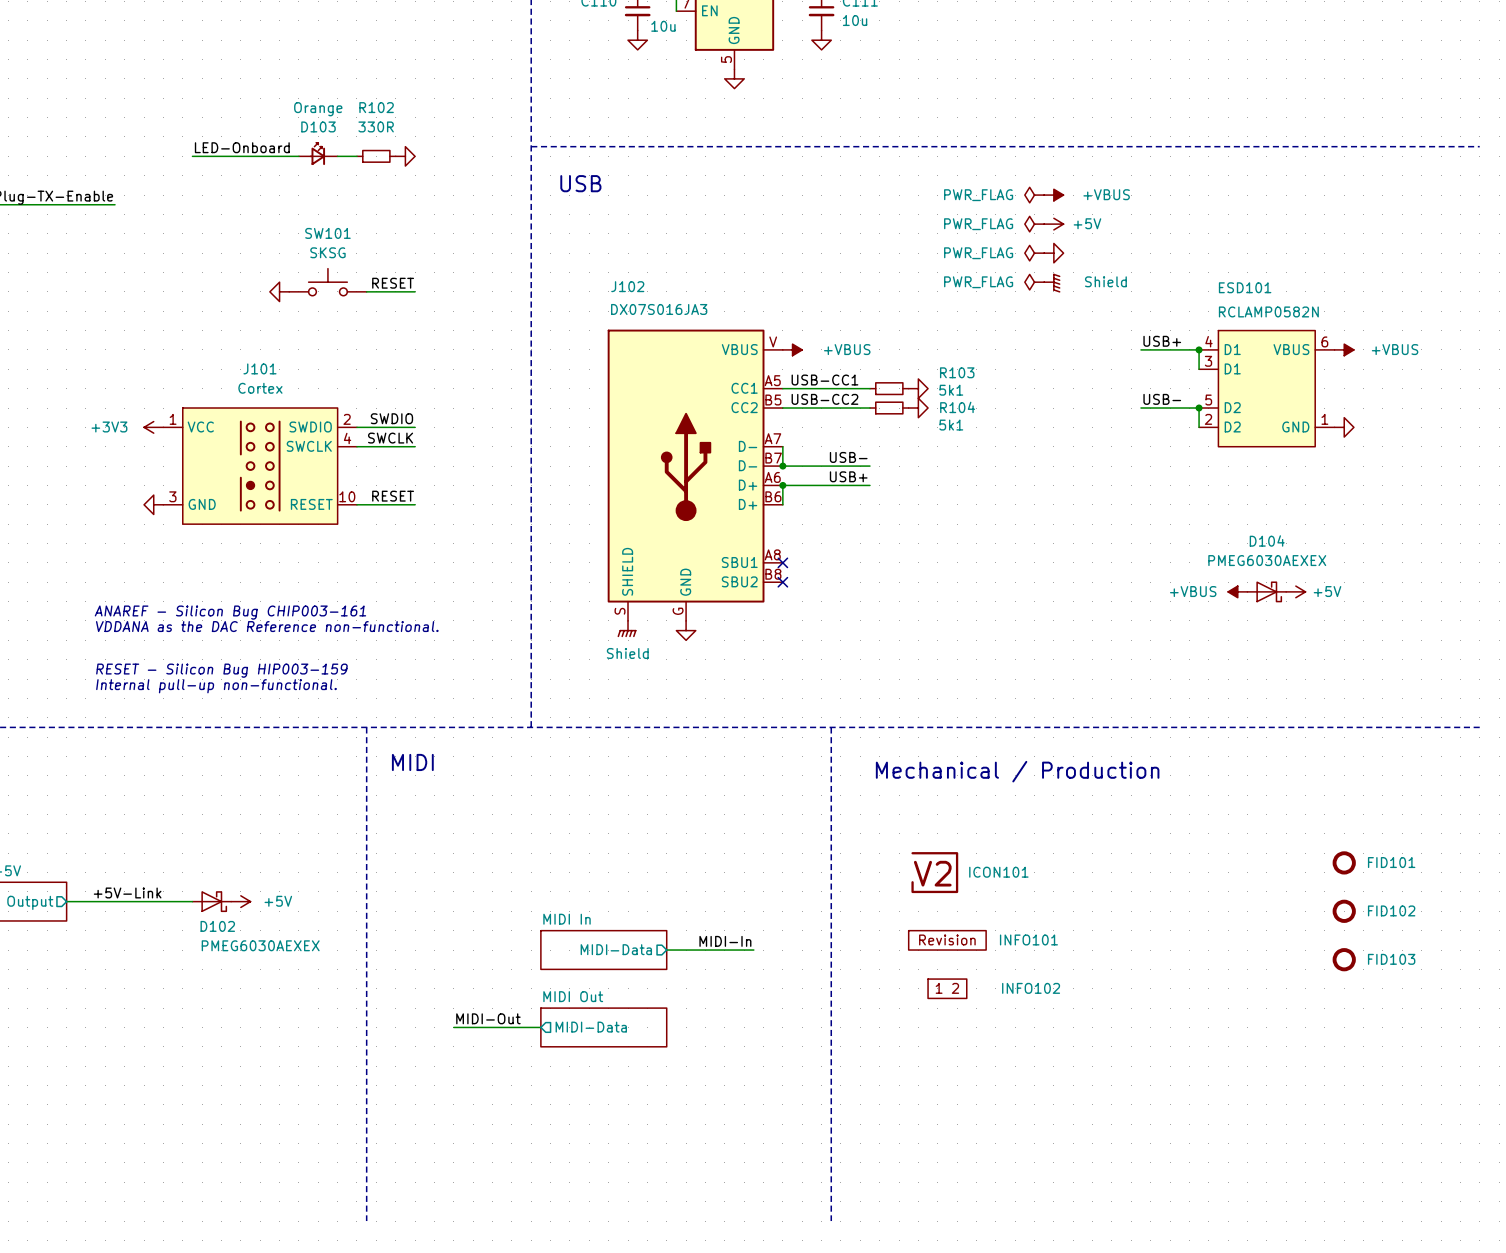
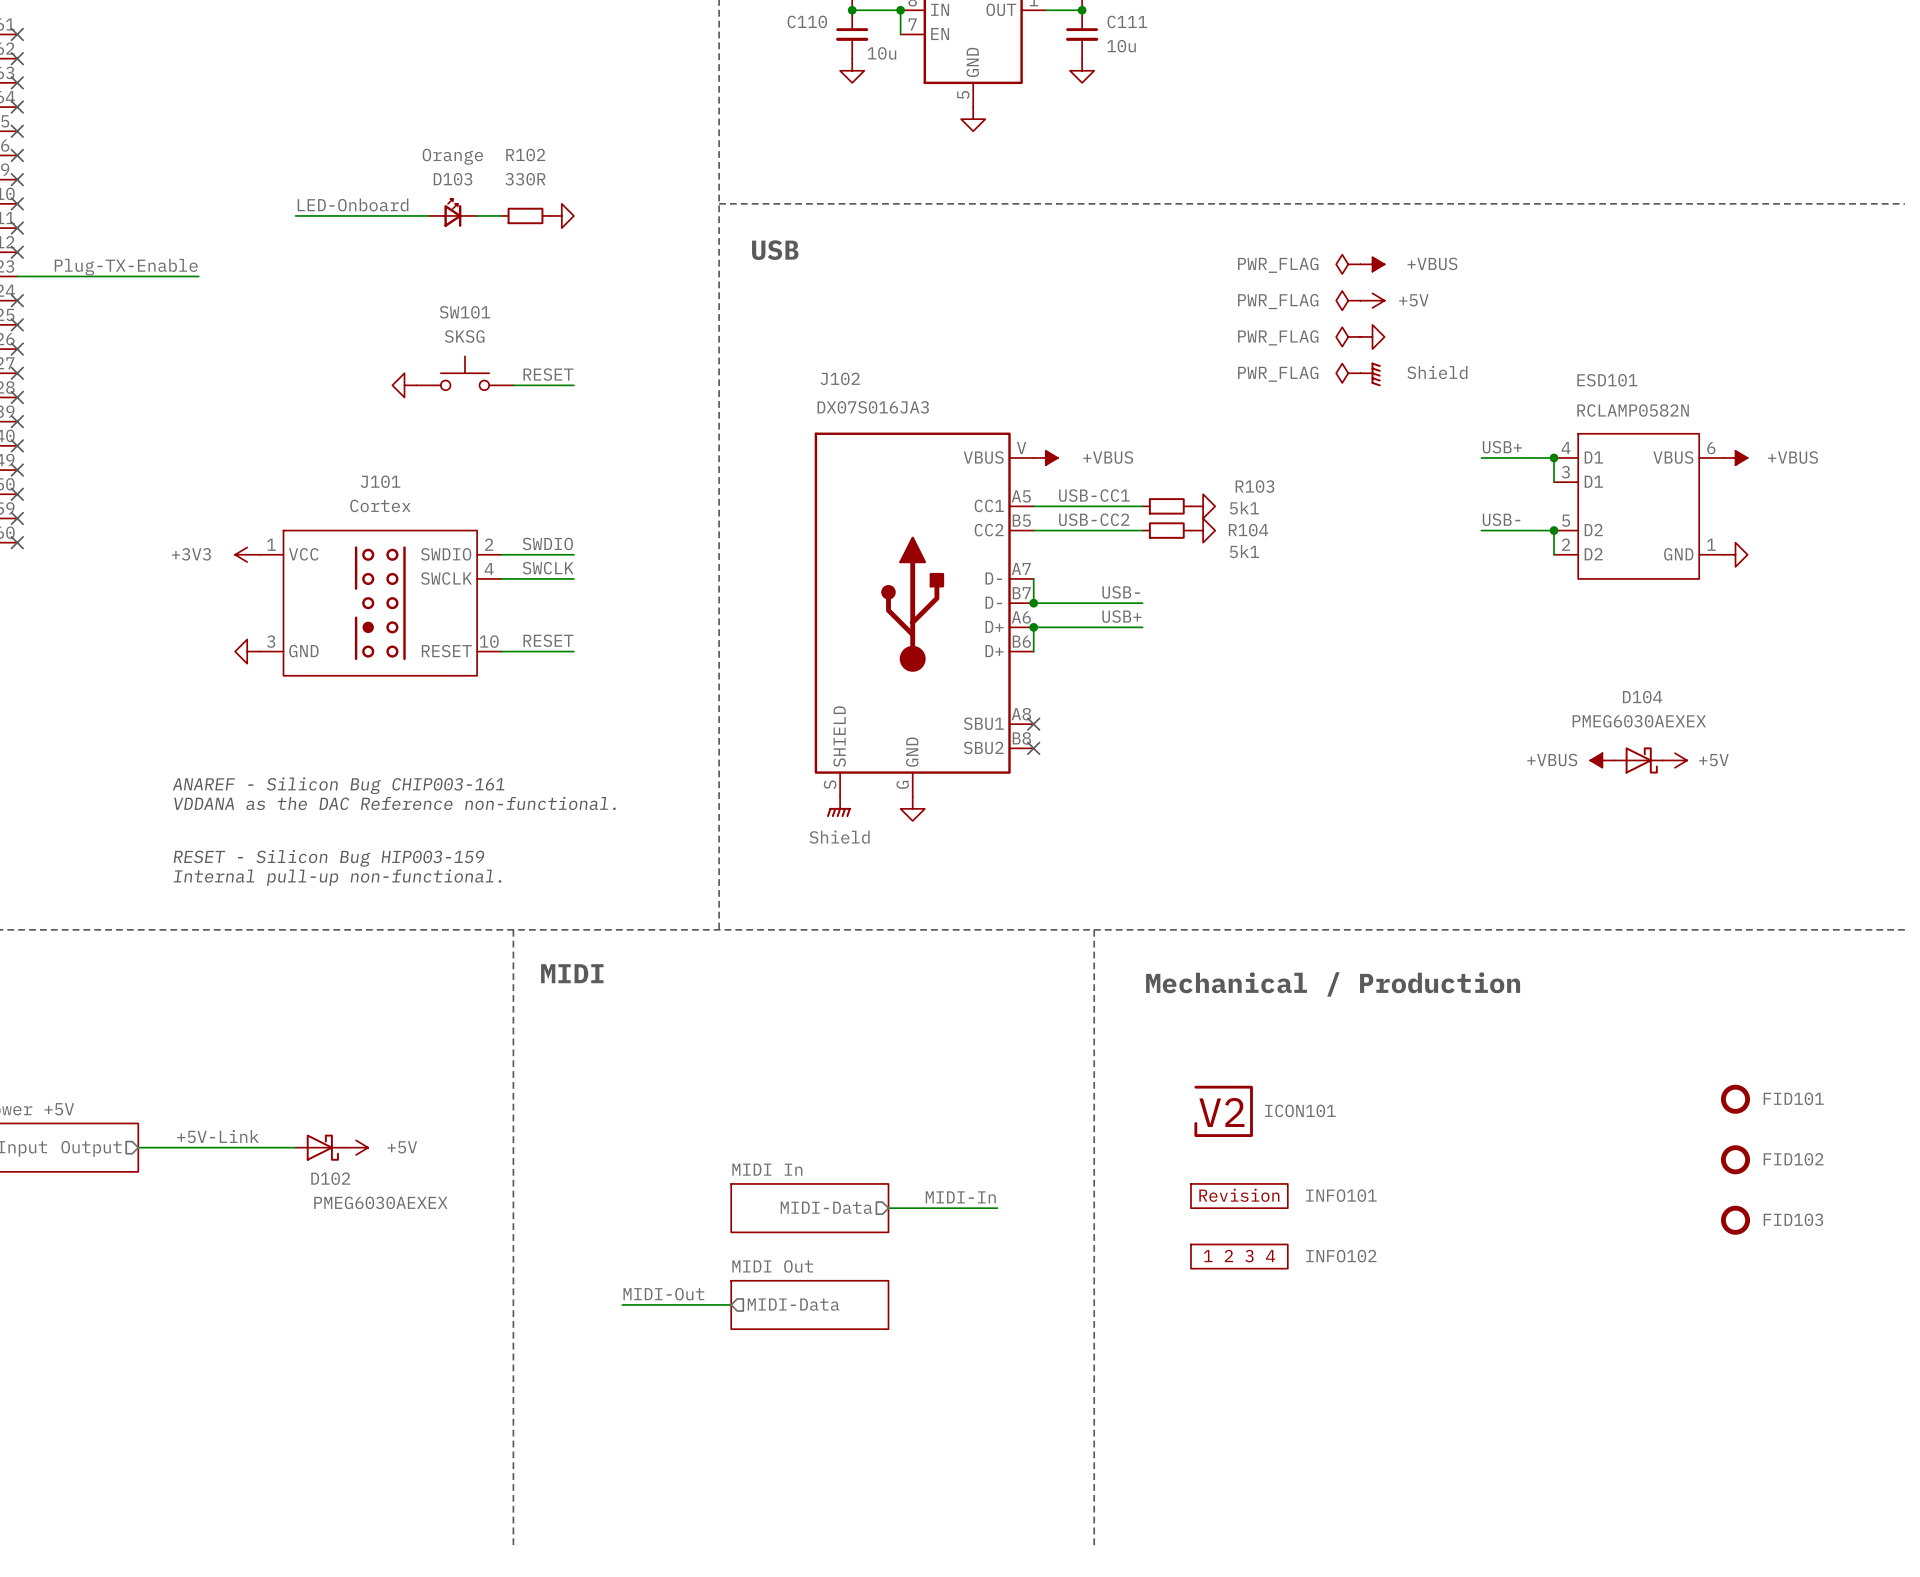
INFO102 symbol: [928, 979, 967, 999] -> [1191, 1244, 1288, 1269]

